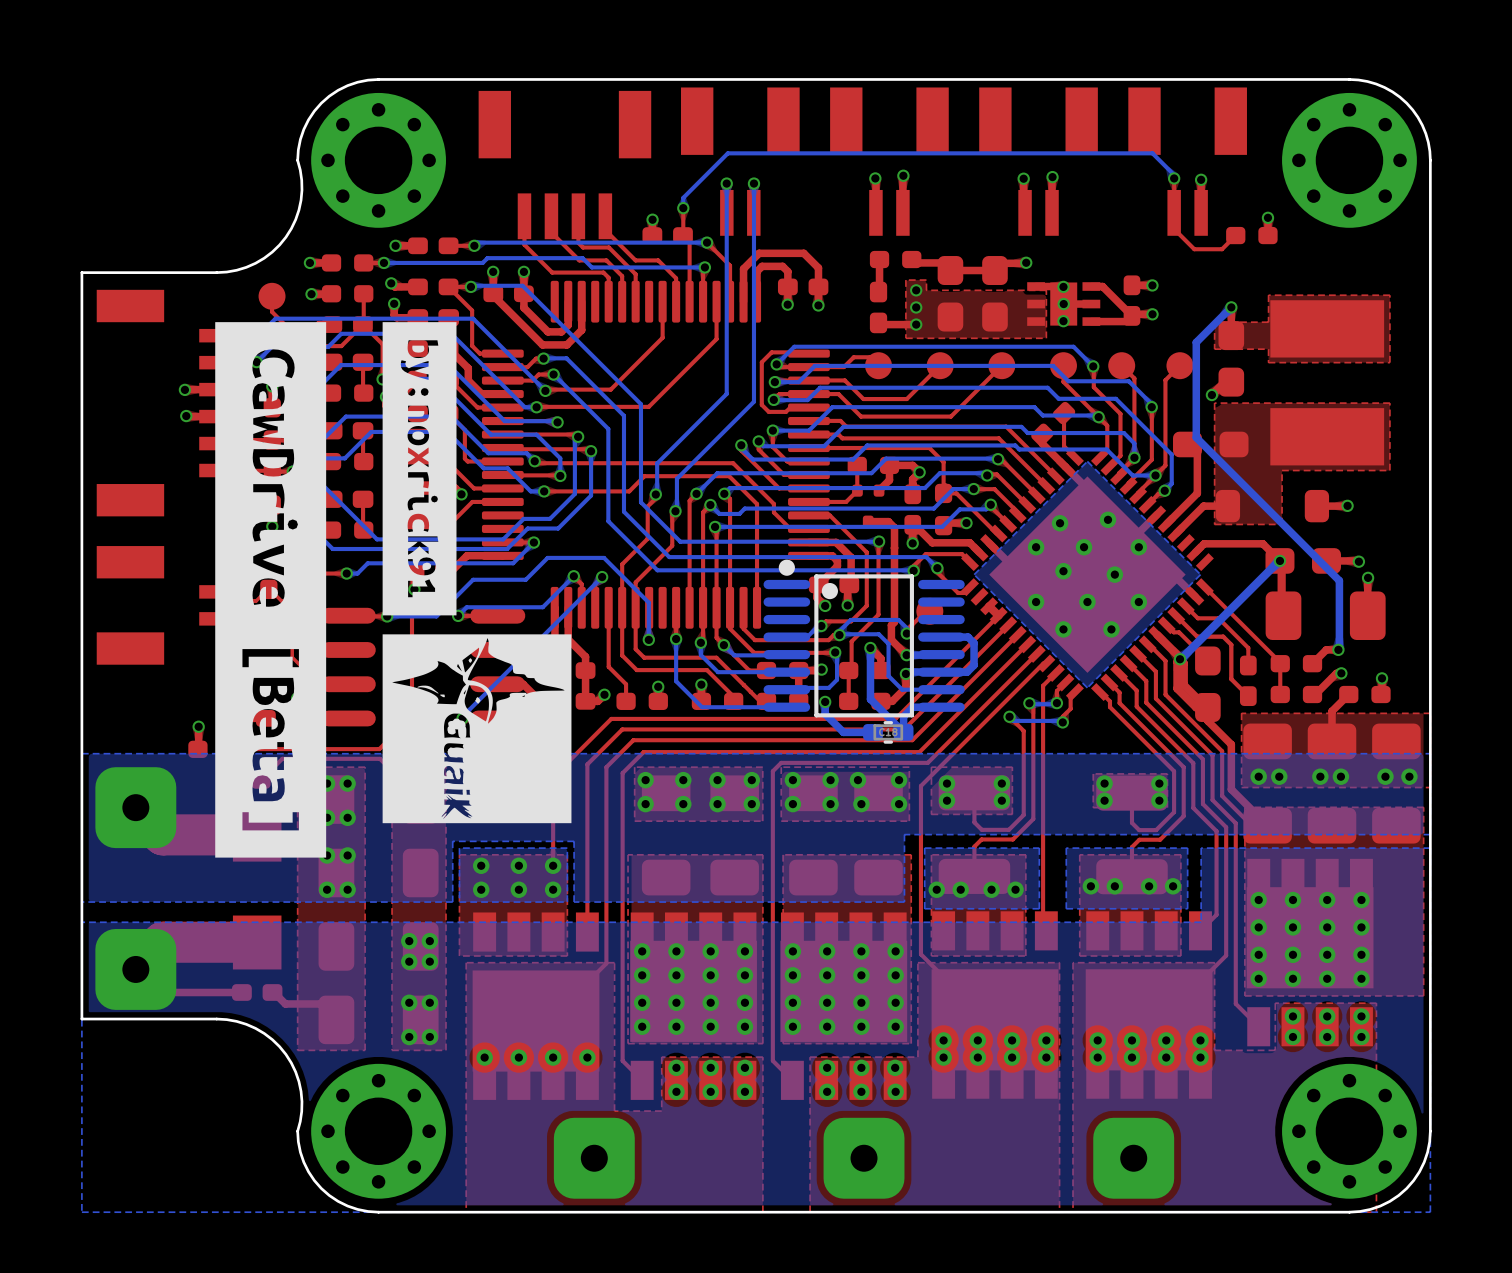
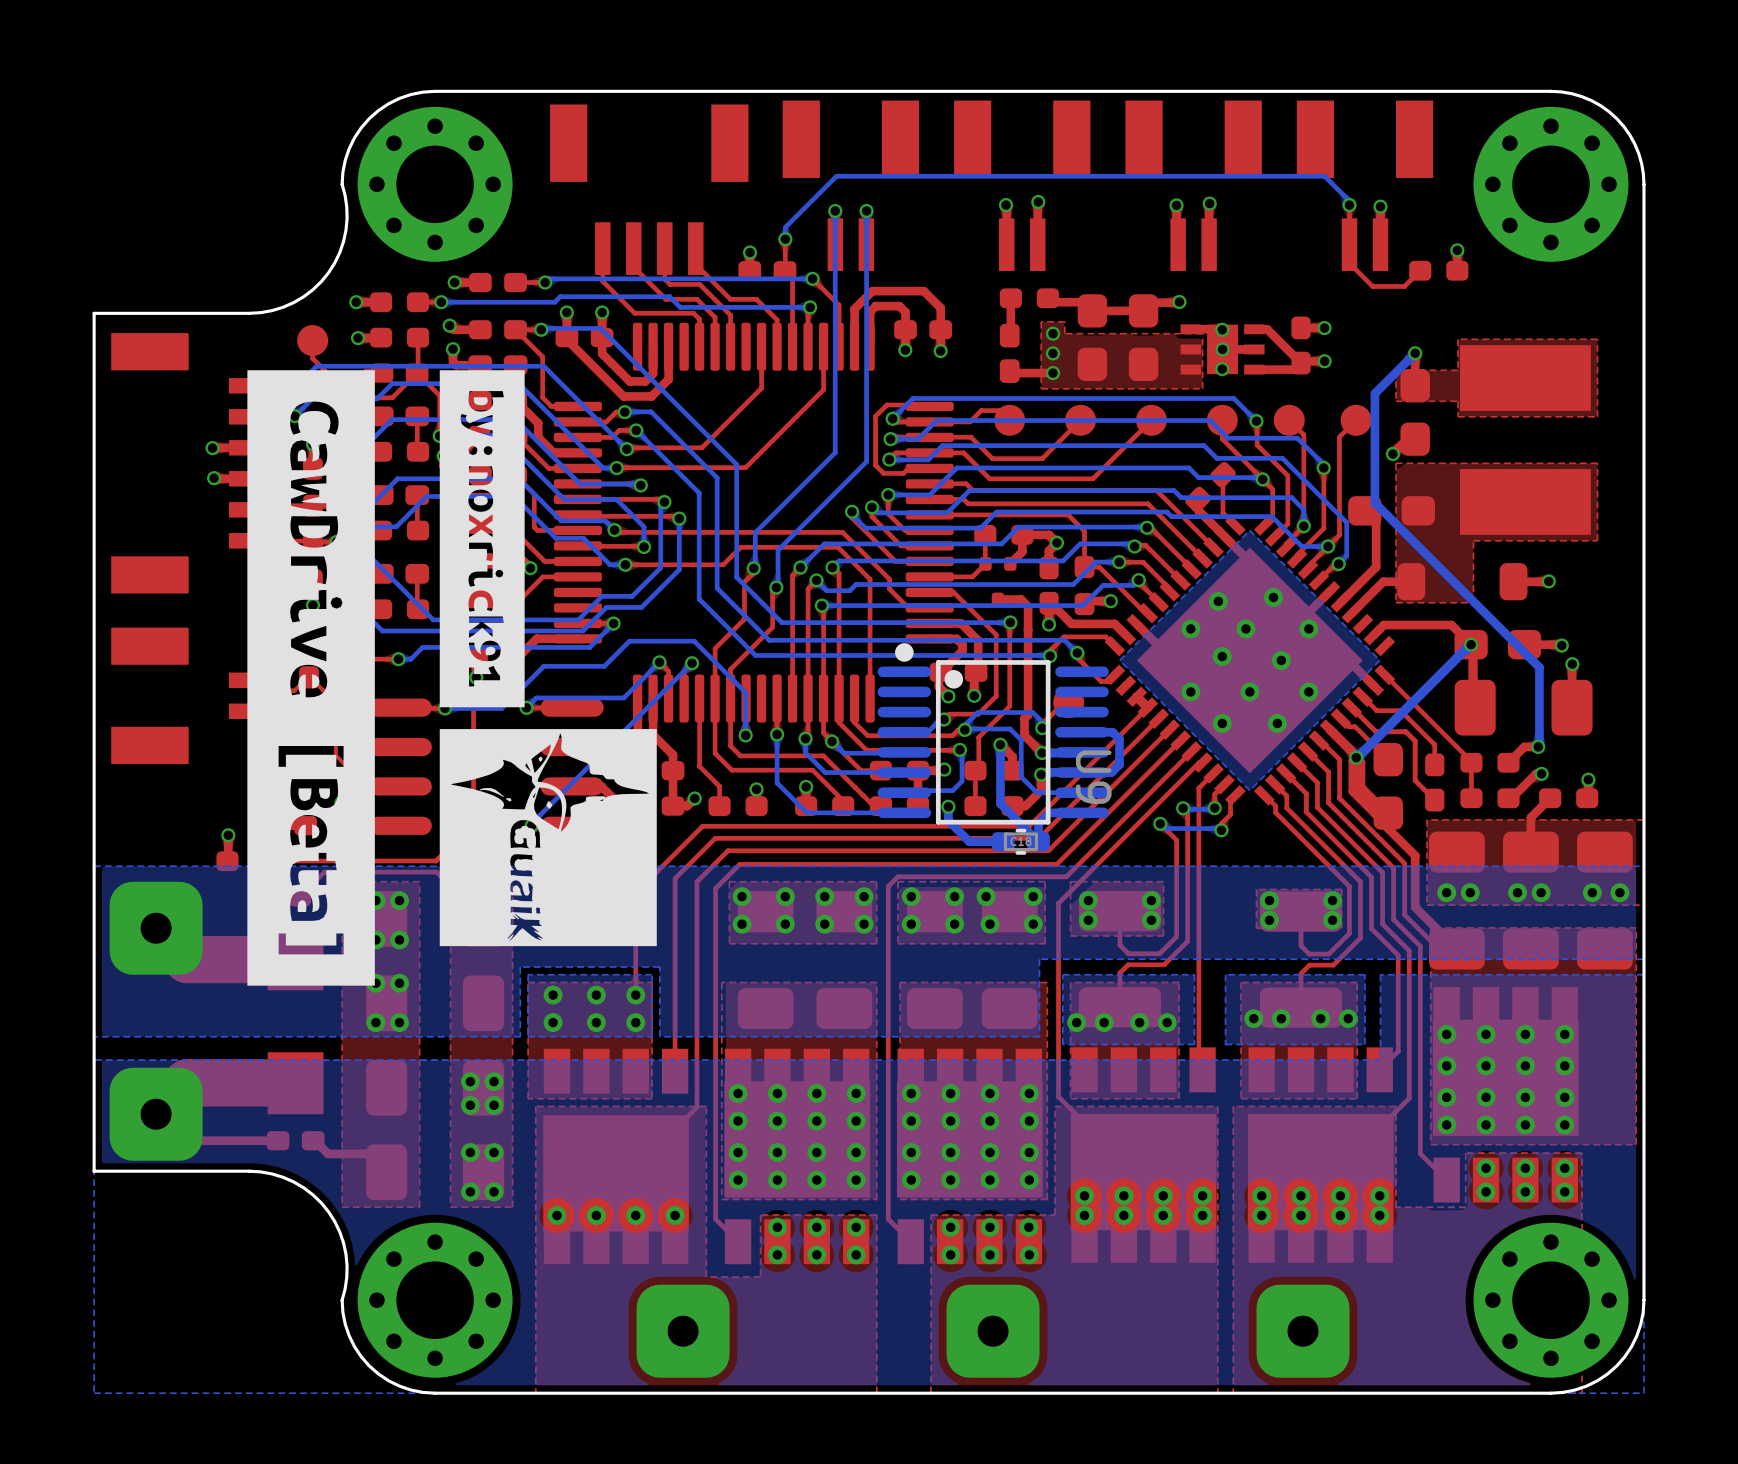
U9 name: none -> U9 (1093, 777)

